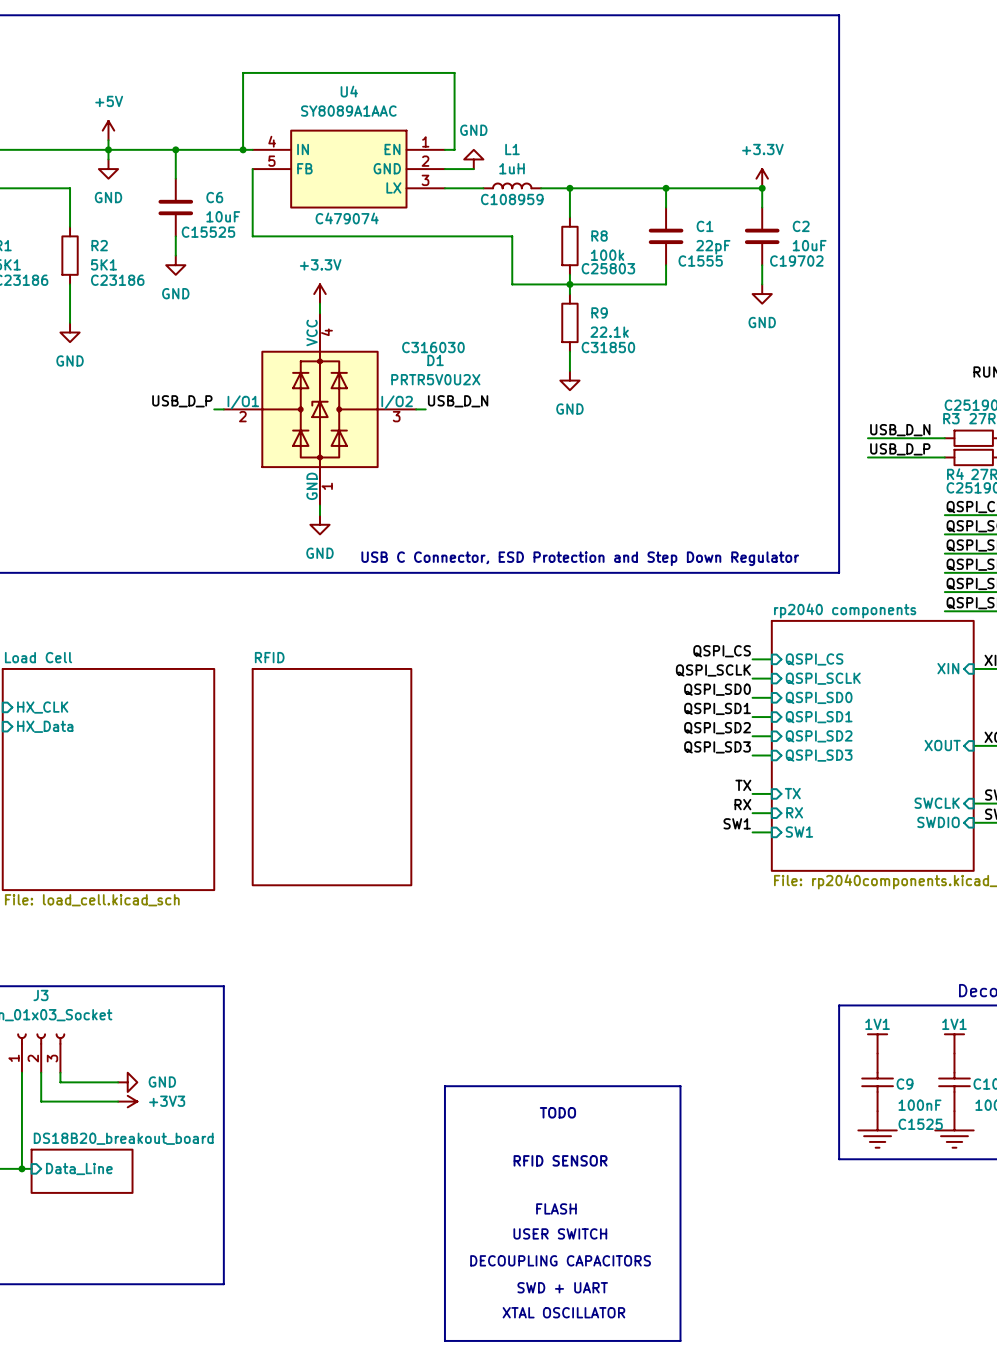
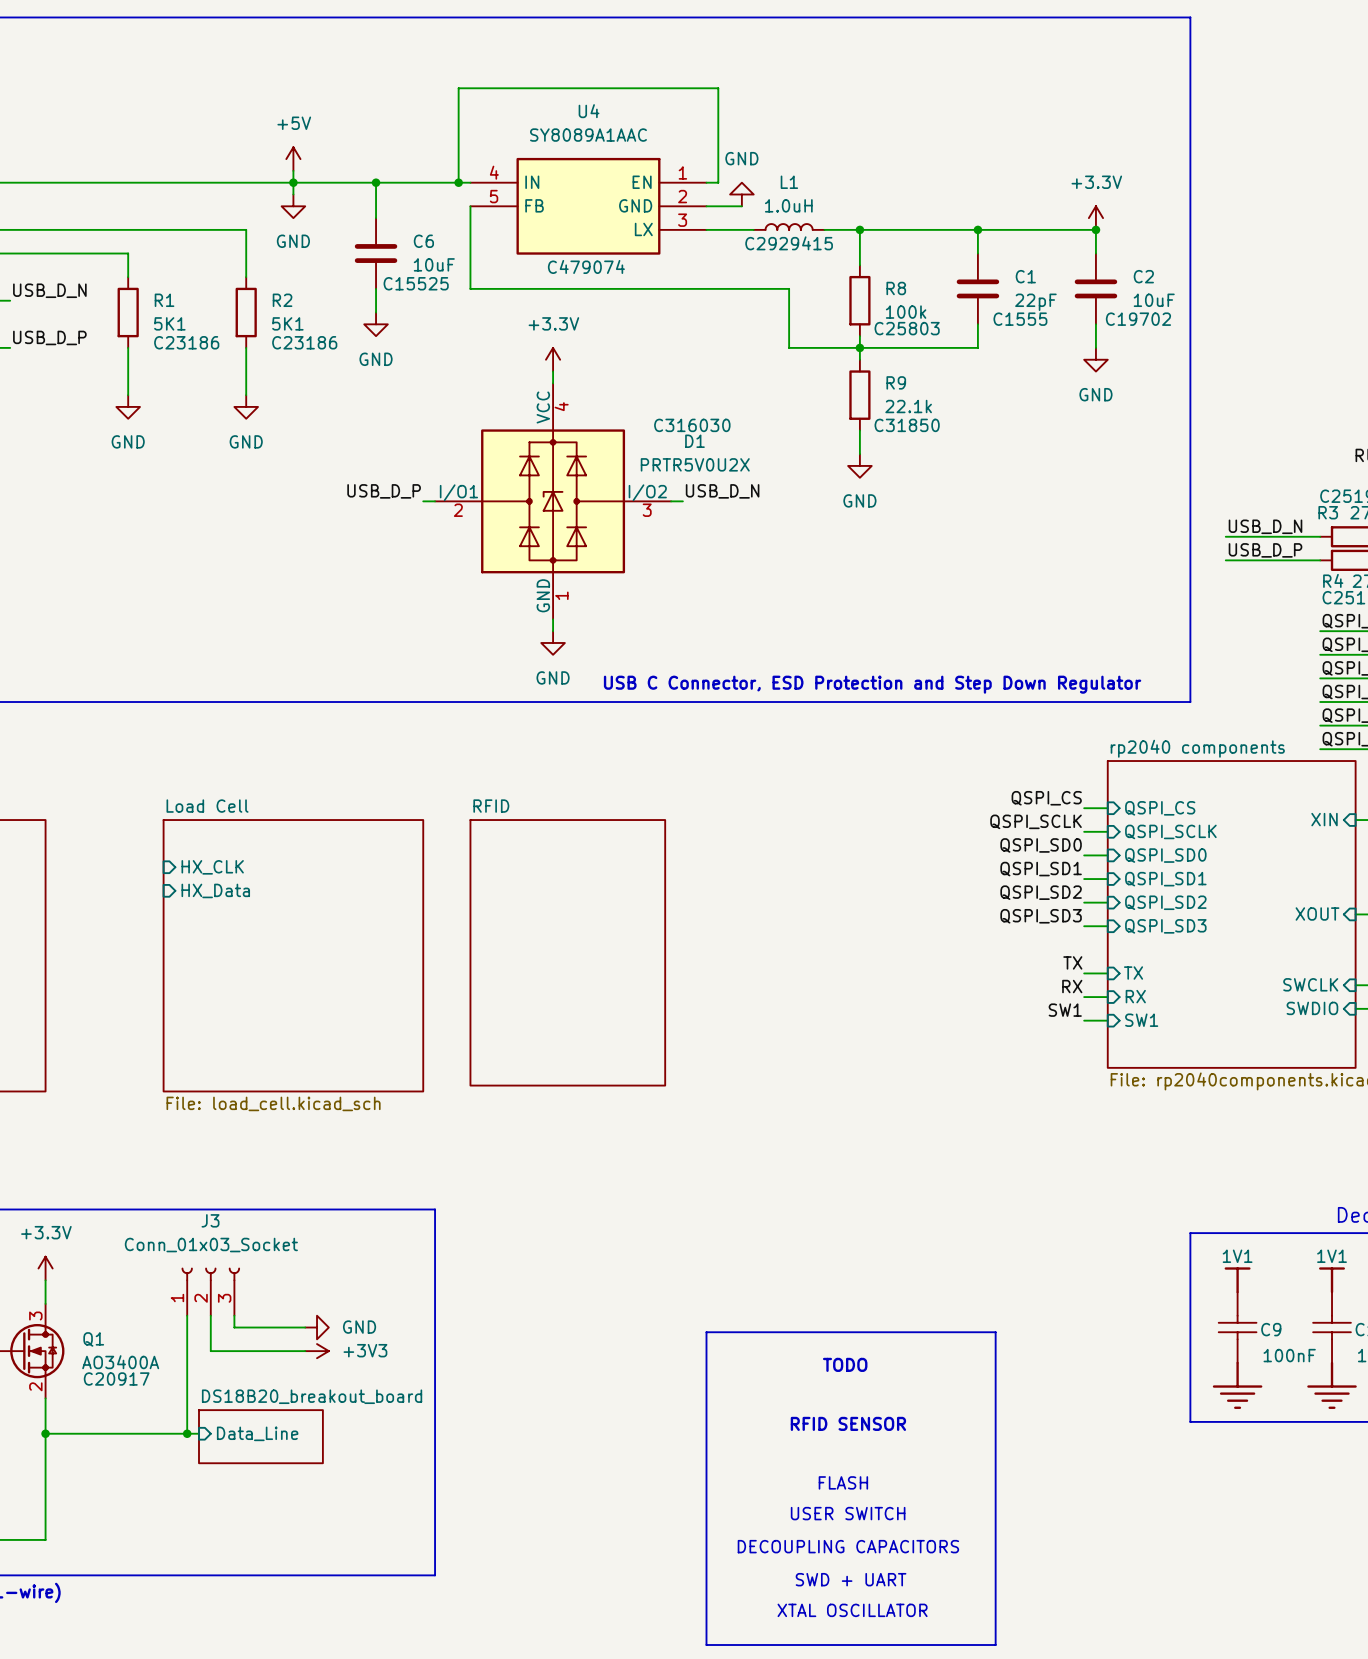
L1 value: 1uH (512, 168) -> 1.0uH (788, 205)
L1 text: C108959 (512, 199) -> C2929415 (789, 243)
C9 text: C1525 (920, 1124) -> none

